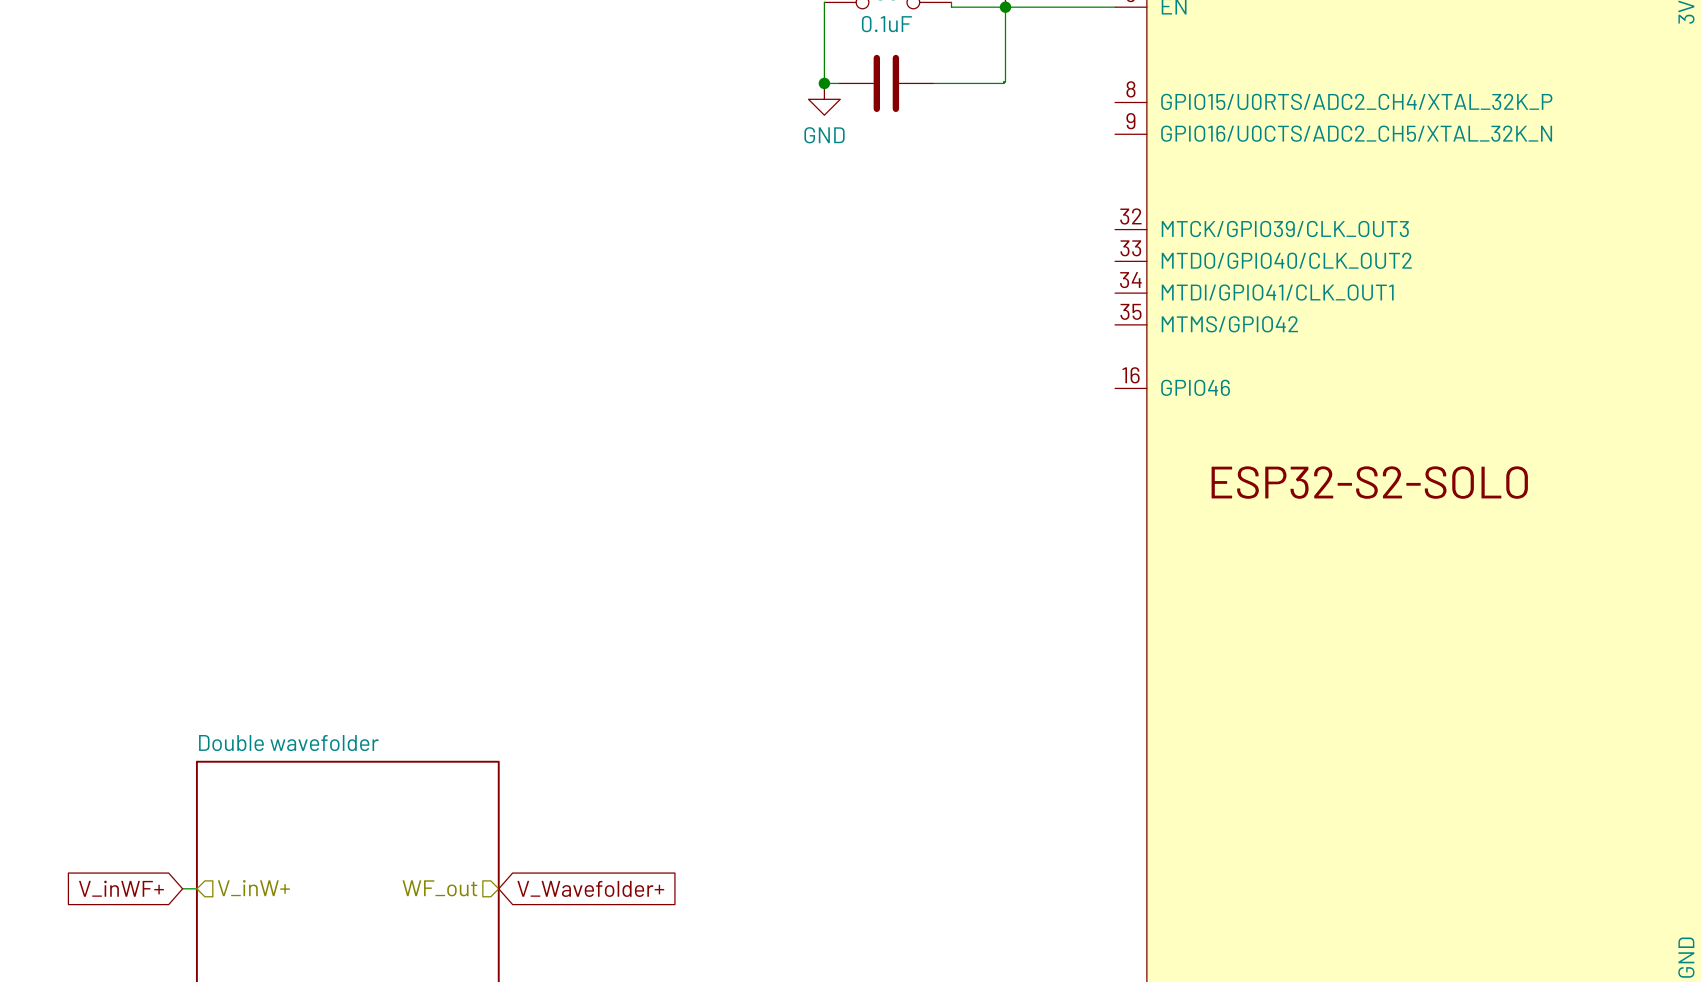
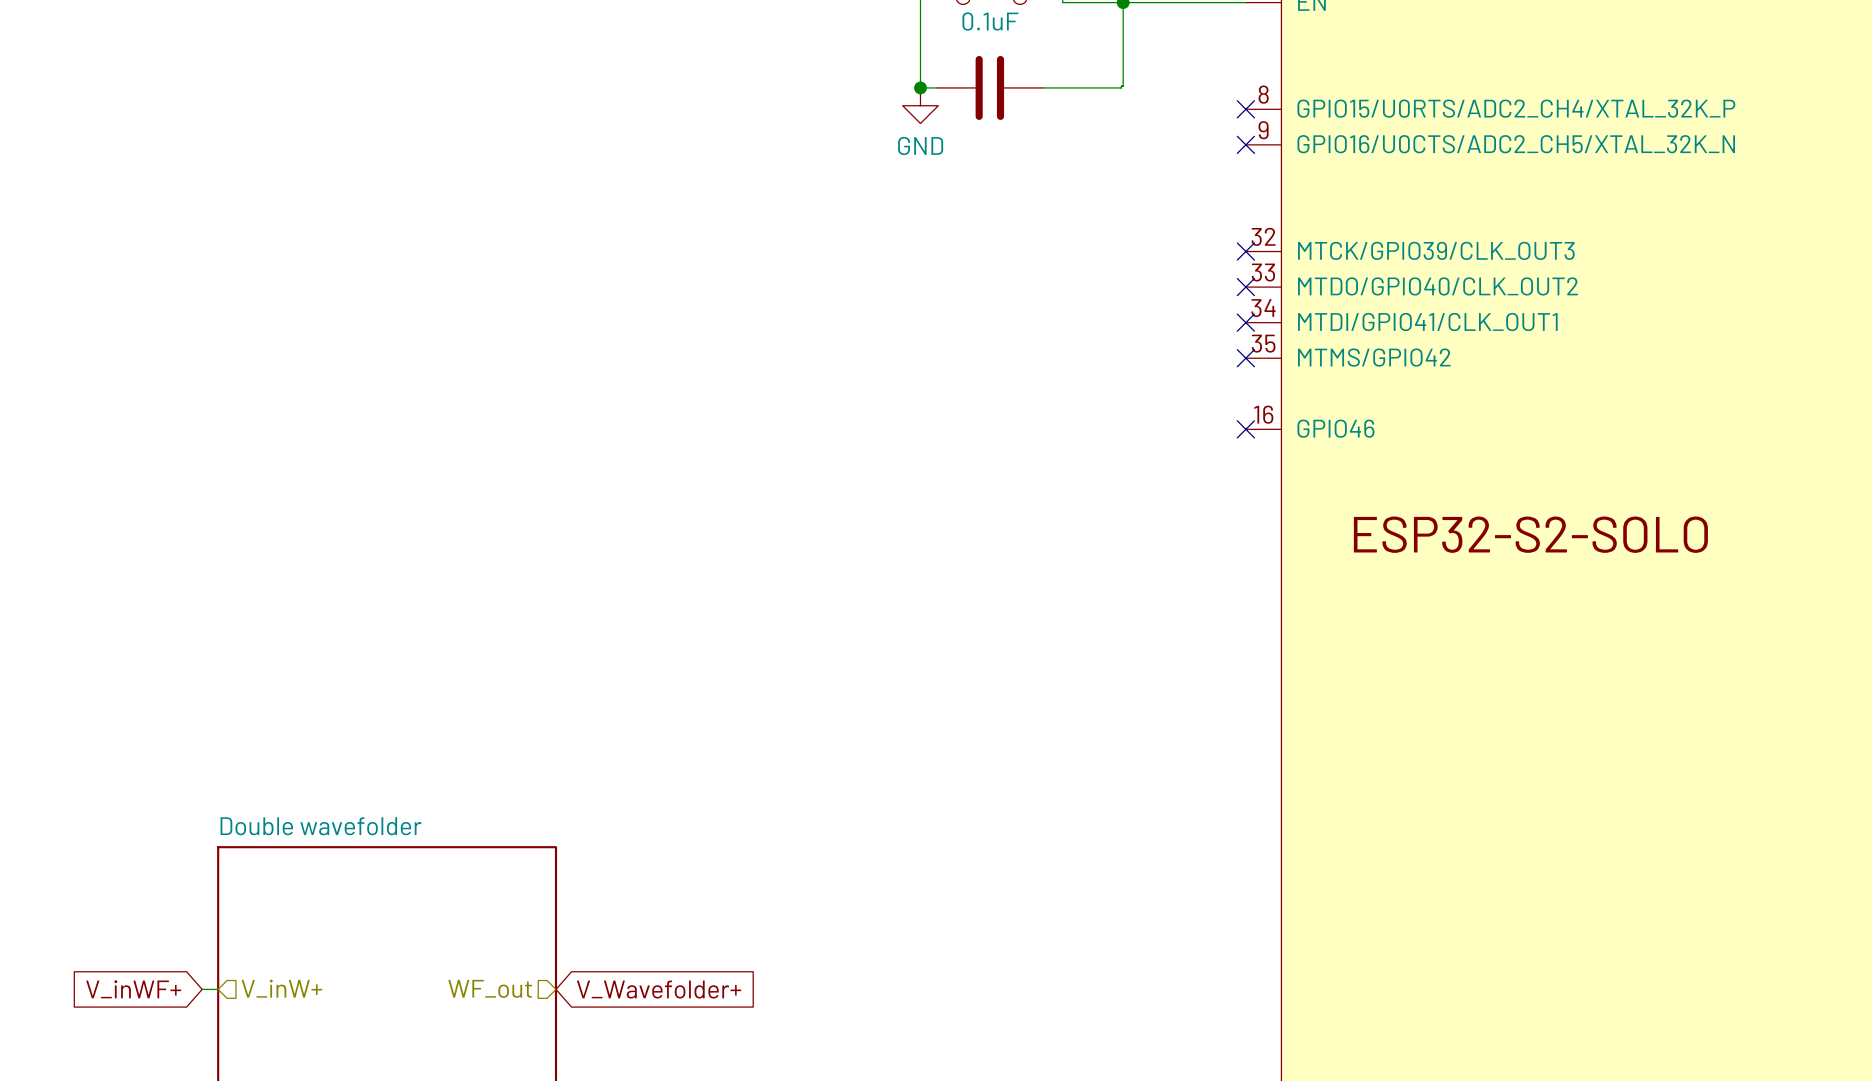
no-connect mark: none -> (1245, 109)
no-connect mark: none -> (1245, 144)
no-connect mark: none -> (1245, 251)
no-connect mark: none -> (1245, 287)
no-connect mark: none -> (1245, 322)
no-connect mark: none -> (1245, 358)
no-connect mark: none -> (1245, 429)

